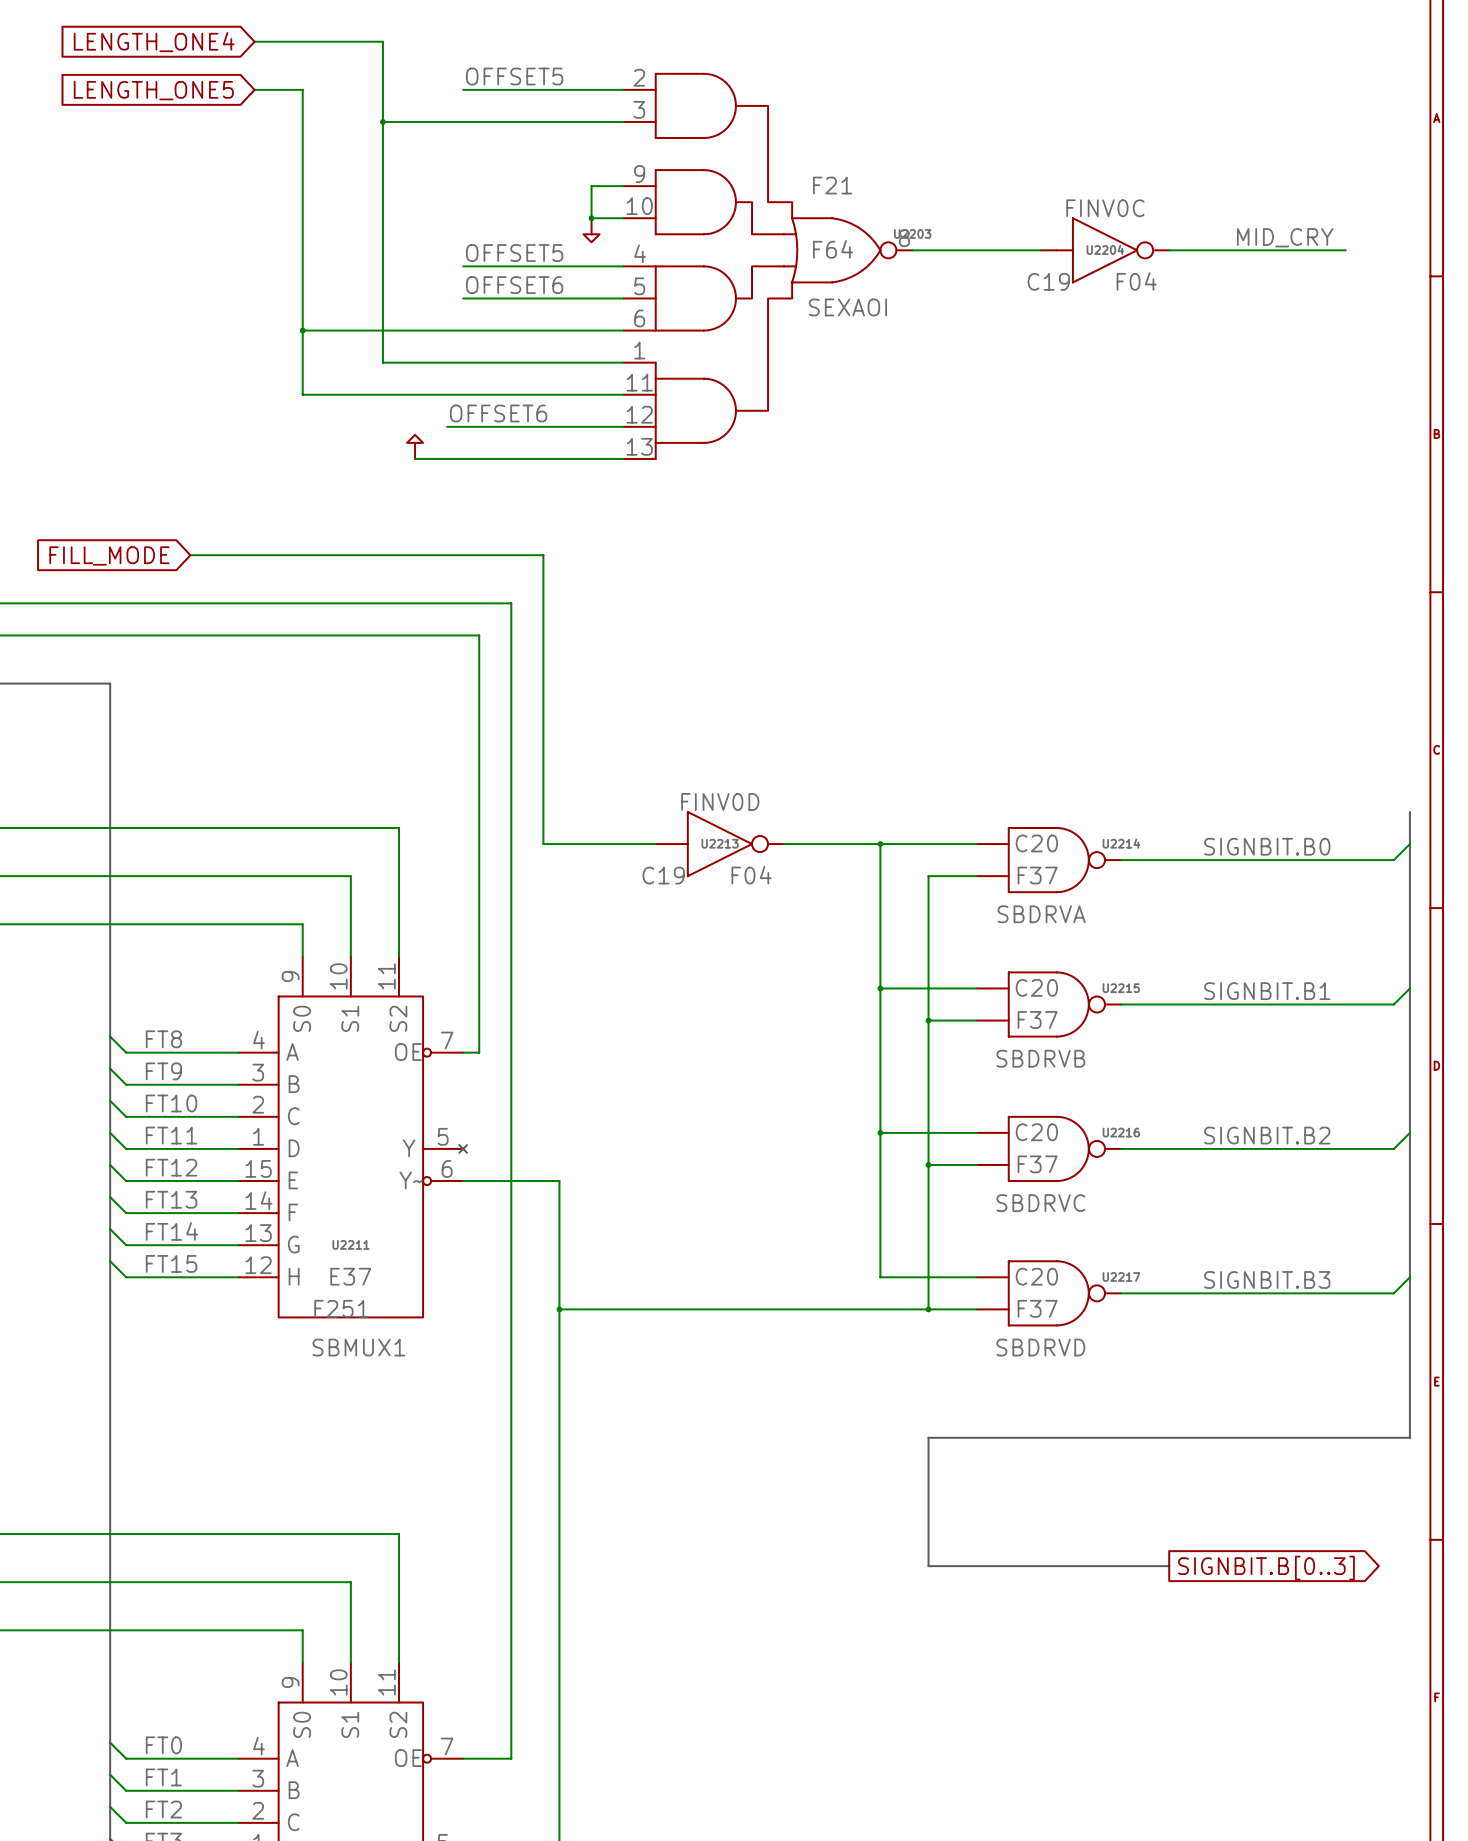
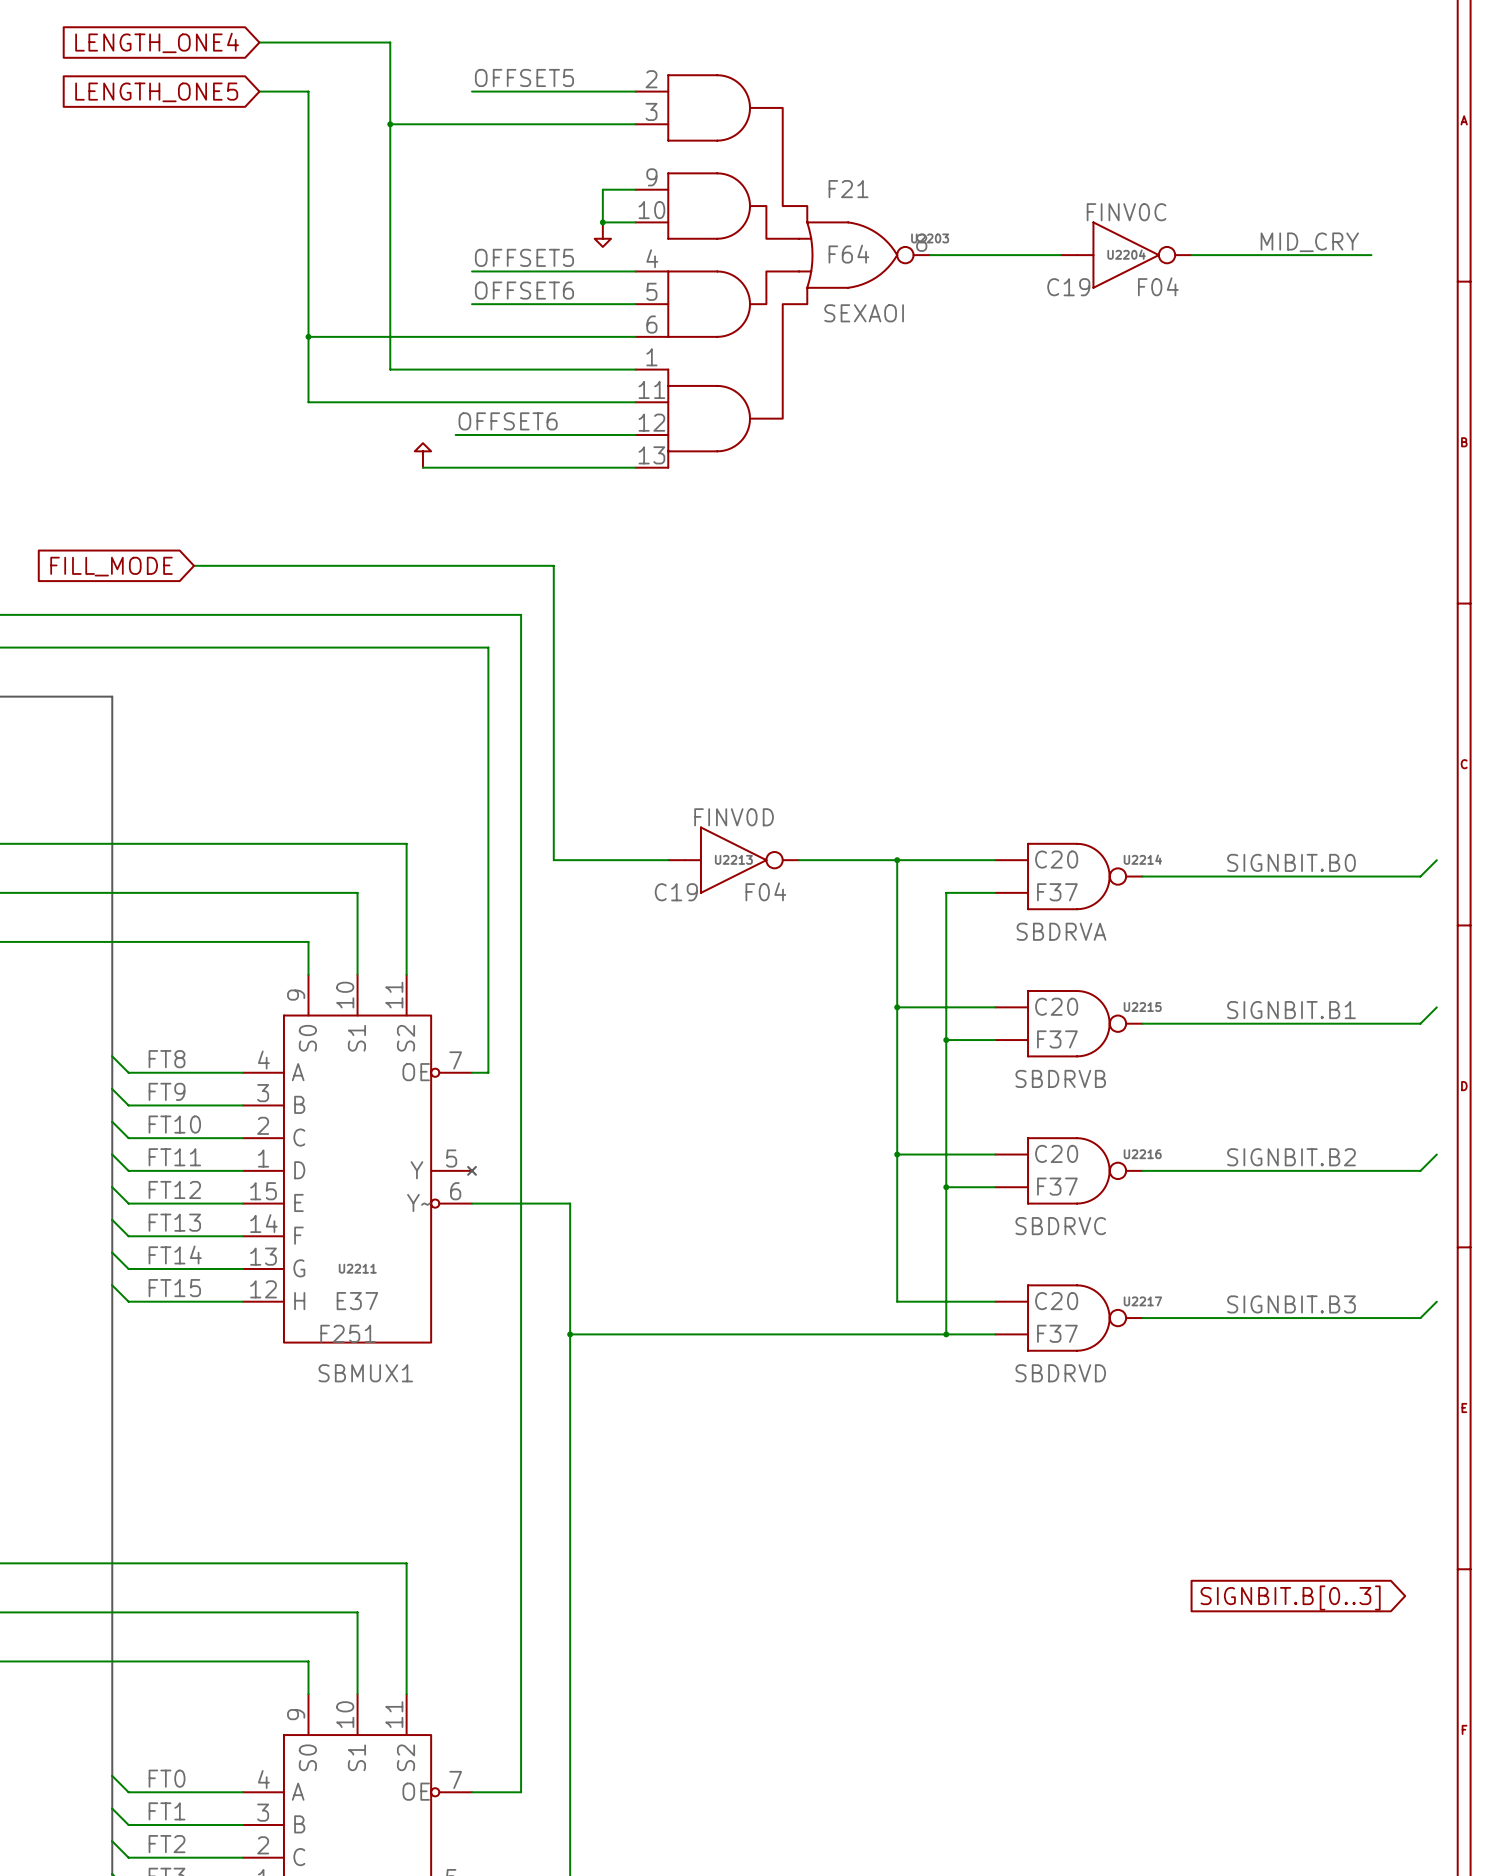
bus: (1409, 811) (1409, 1437) (928, 1437) (928, 1566) (1169, 1566) -> none

